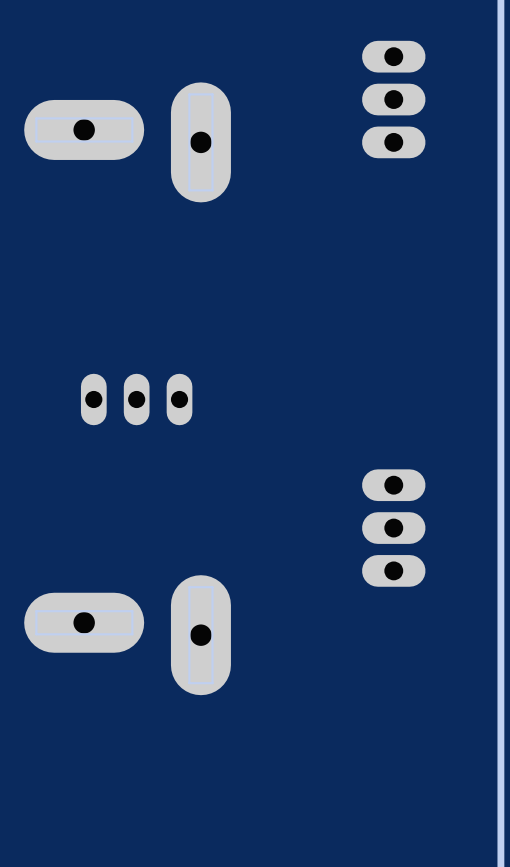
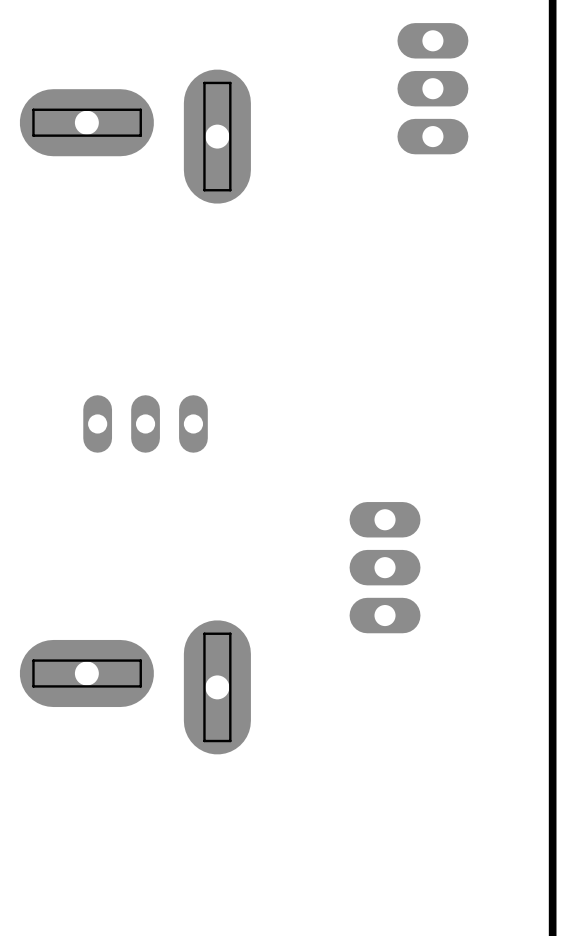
part position: (393, 528) -> (385, 567)

